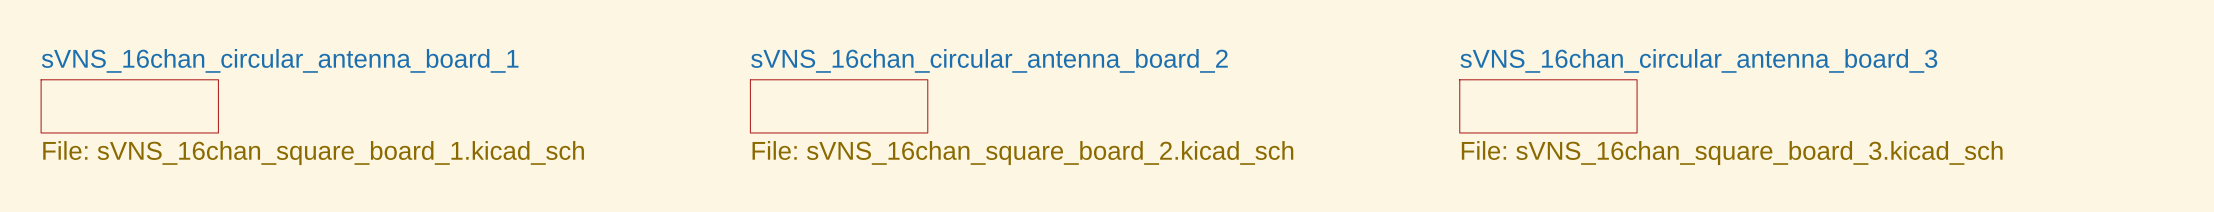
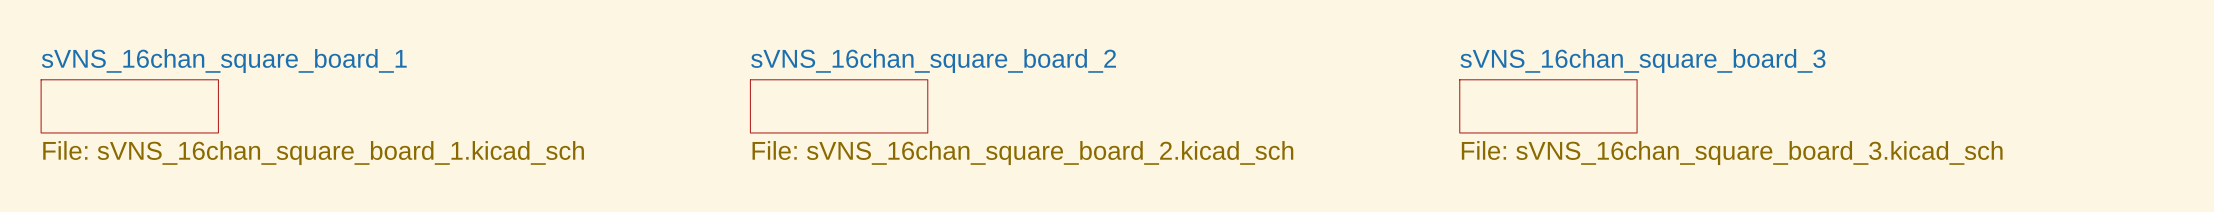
sheet sVNS_16chan_circular_antenna_board_1 name: sVNS_16chan_circular_antenna_board_1 (280, 60) -> sVNS_16chan_square_board_1 (224, 61)
sheet sVNS_16chan_circular_antenna_board_2 name: sVNS_16chan_circular_antenna_board_2 (989, 60) -> sVNS_16chan_square_board_2 (933, 61)
sheet sVNS_16chan_circular_antenna_board_3 name: sVNS_16chan_circular_antenna_board_3 (1698, 60) -> sVNS_16chan_square_board_3 (1642, 61)

